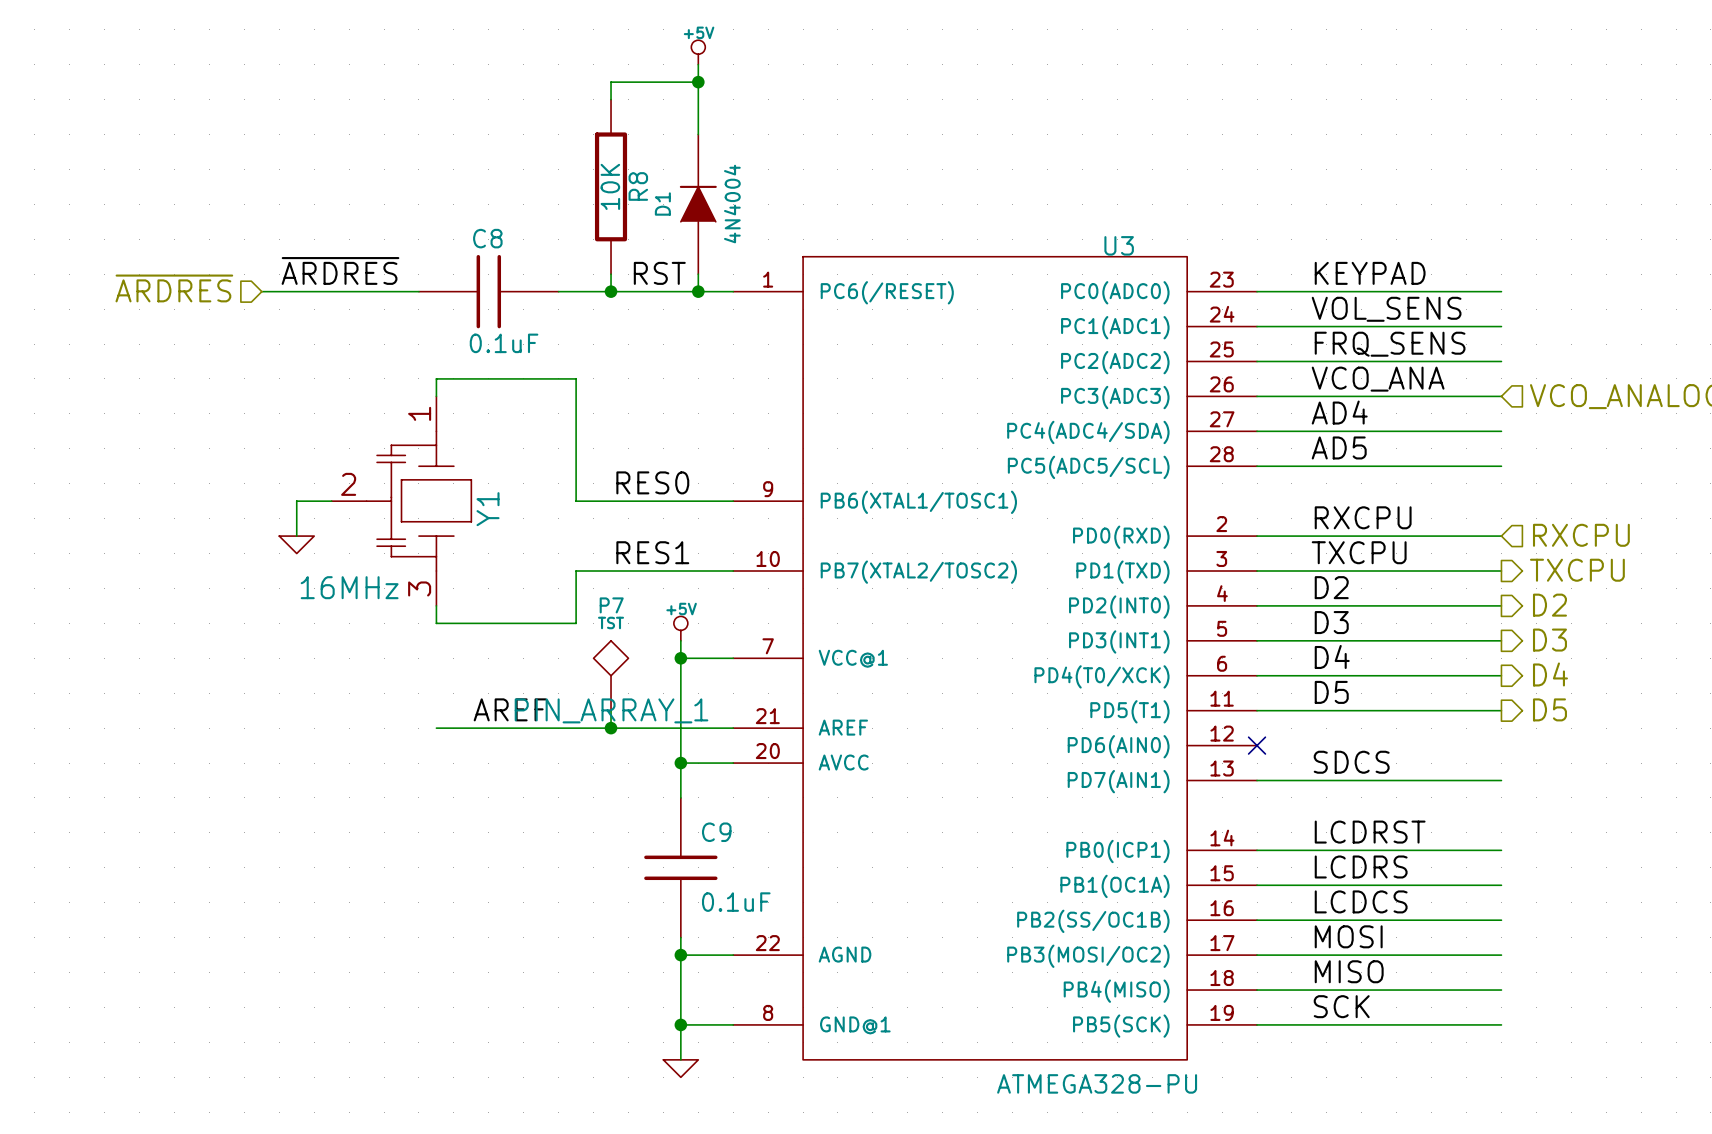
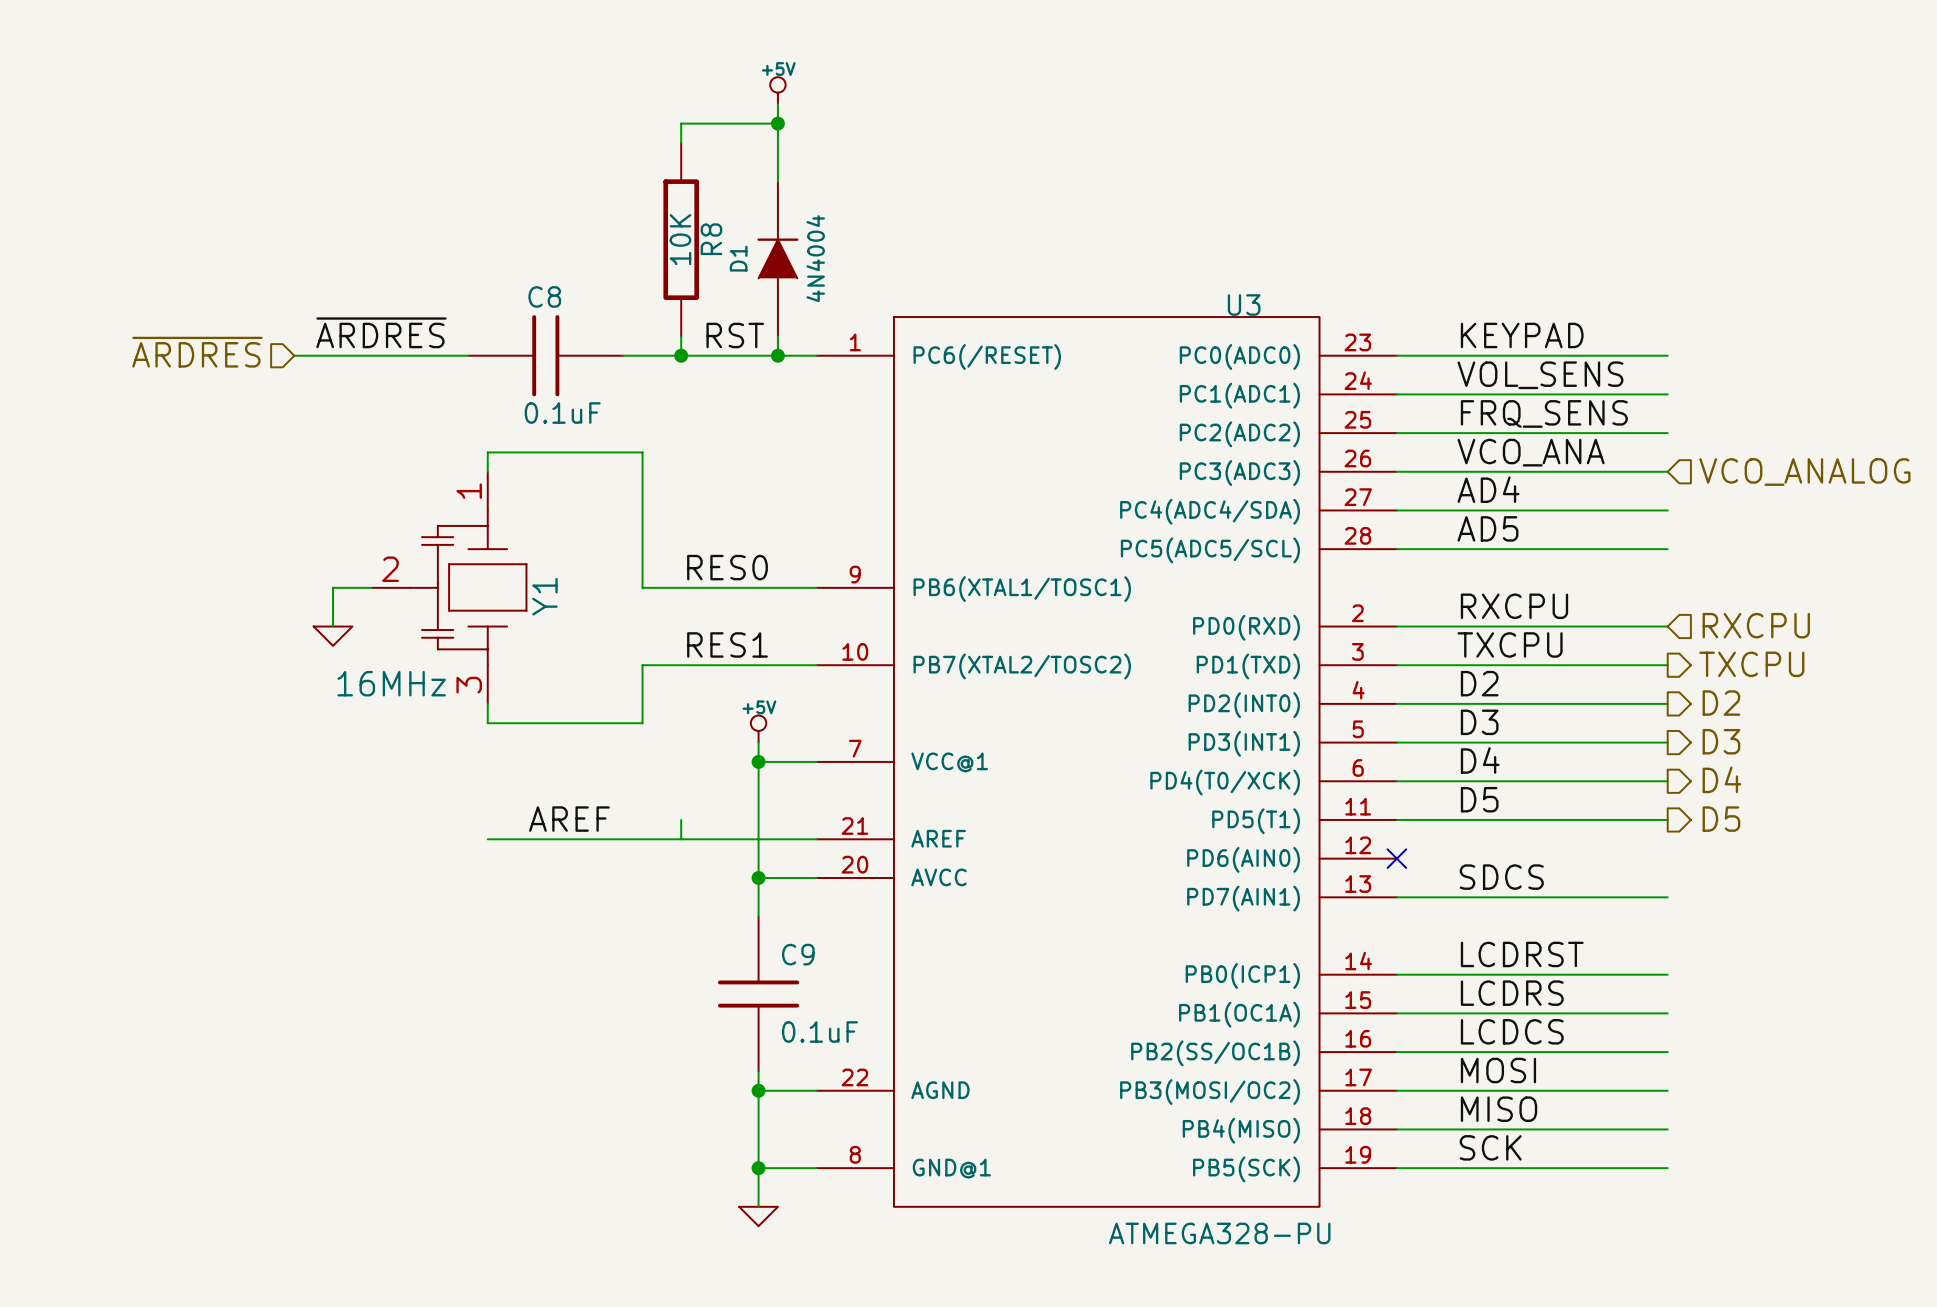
P7: TST (611, 675) -> none
junction: (611, 728) -> none

